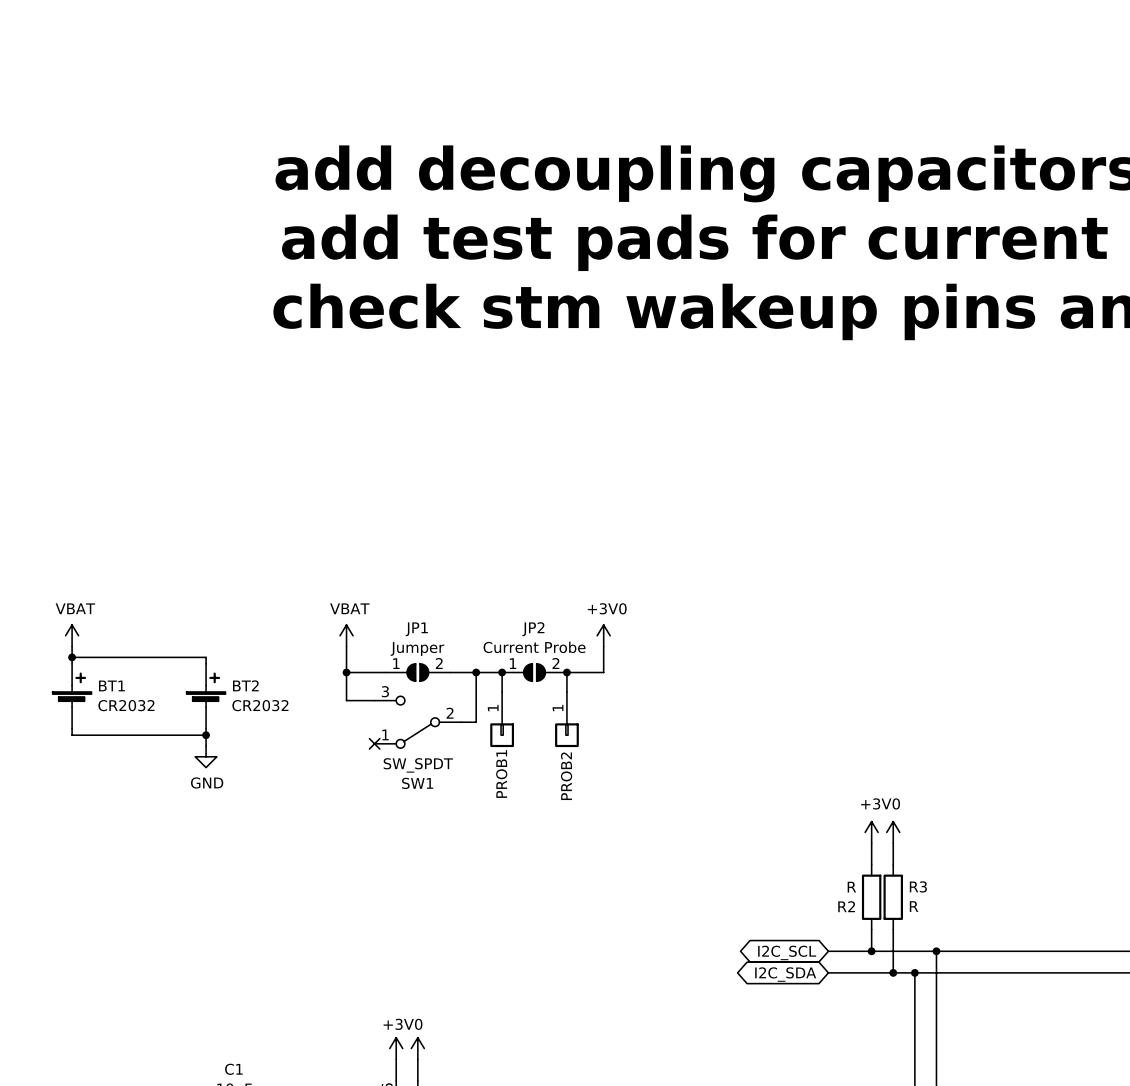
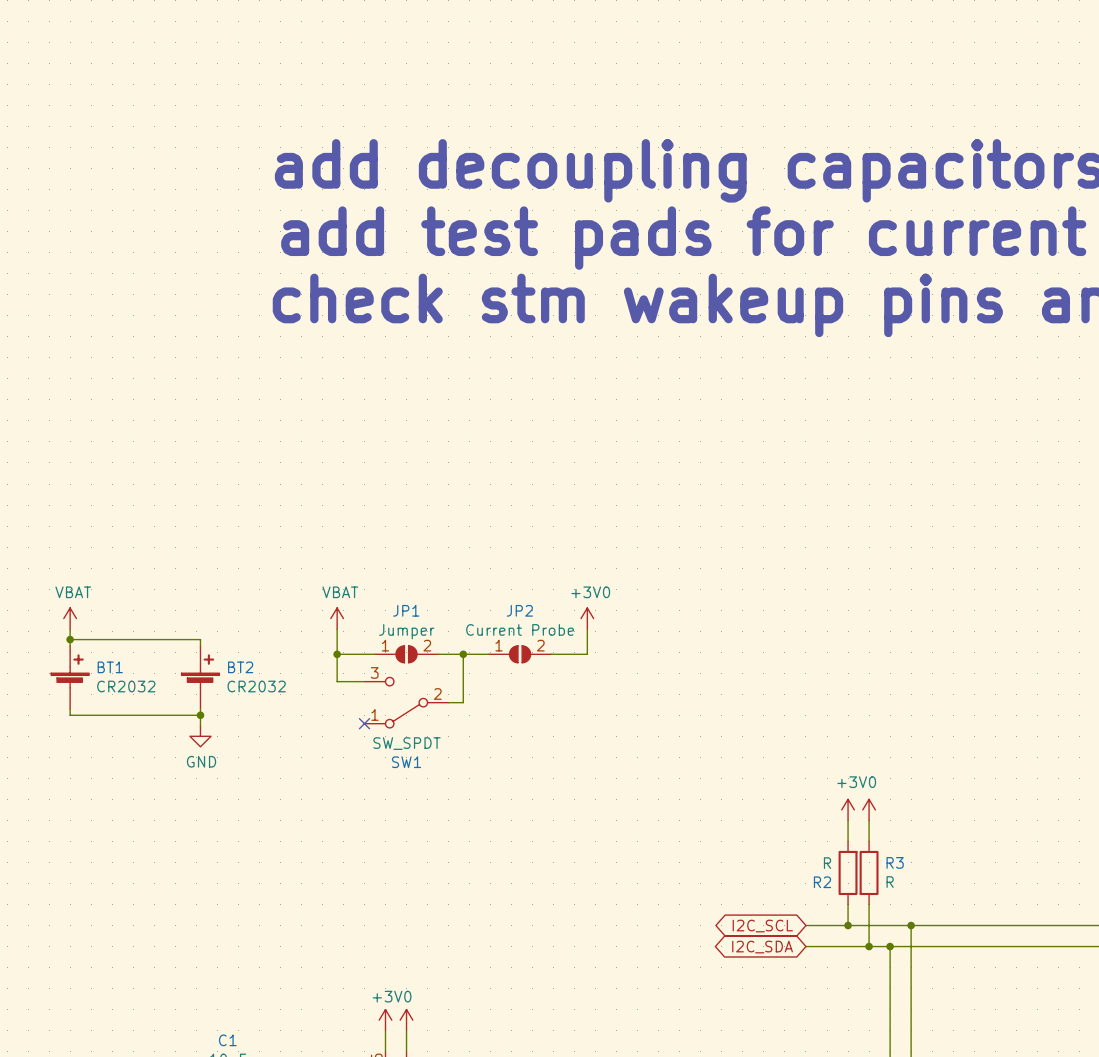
wire: (502, 672) (502, 691) -> none
junction: (502, 672) -> none
wire: (566, 672) (566, 691) -> none
junction: (566, 672) -> none
part: PROB1 (502, 719) -> none
part: PROB2 (566, 719) -> none

